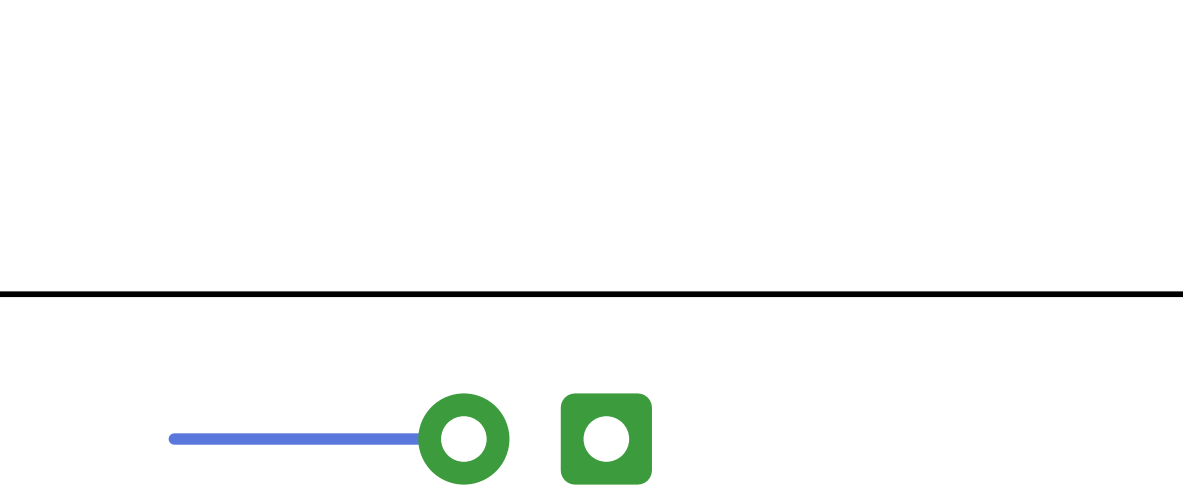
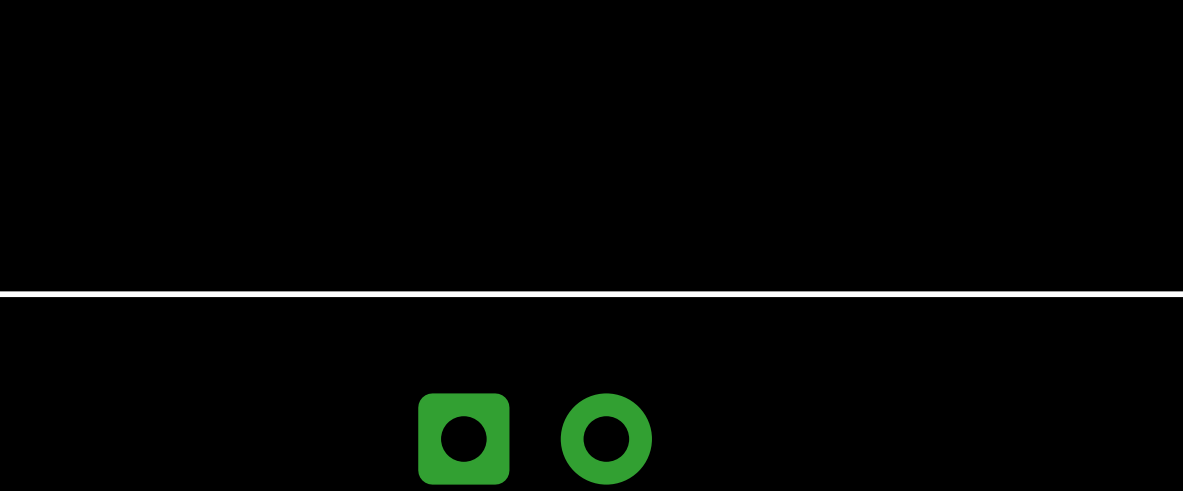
track: (463, 439) (174, 439) -> none
part rotation: 0° (535, 439) -> 180° (535, 439)

